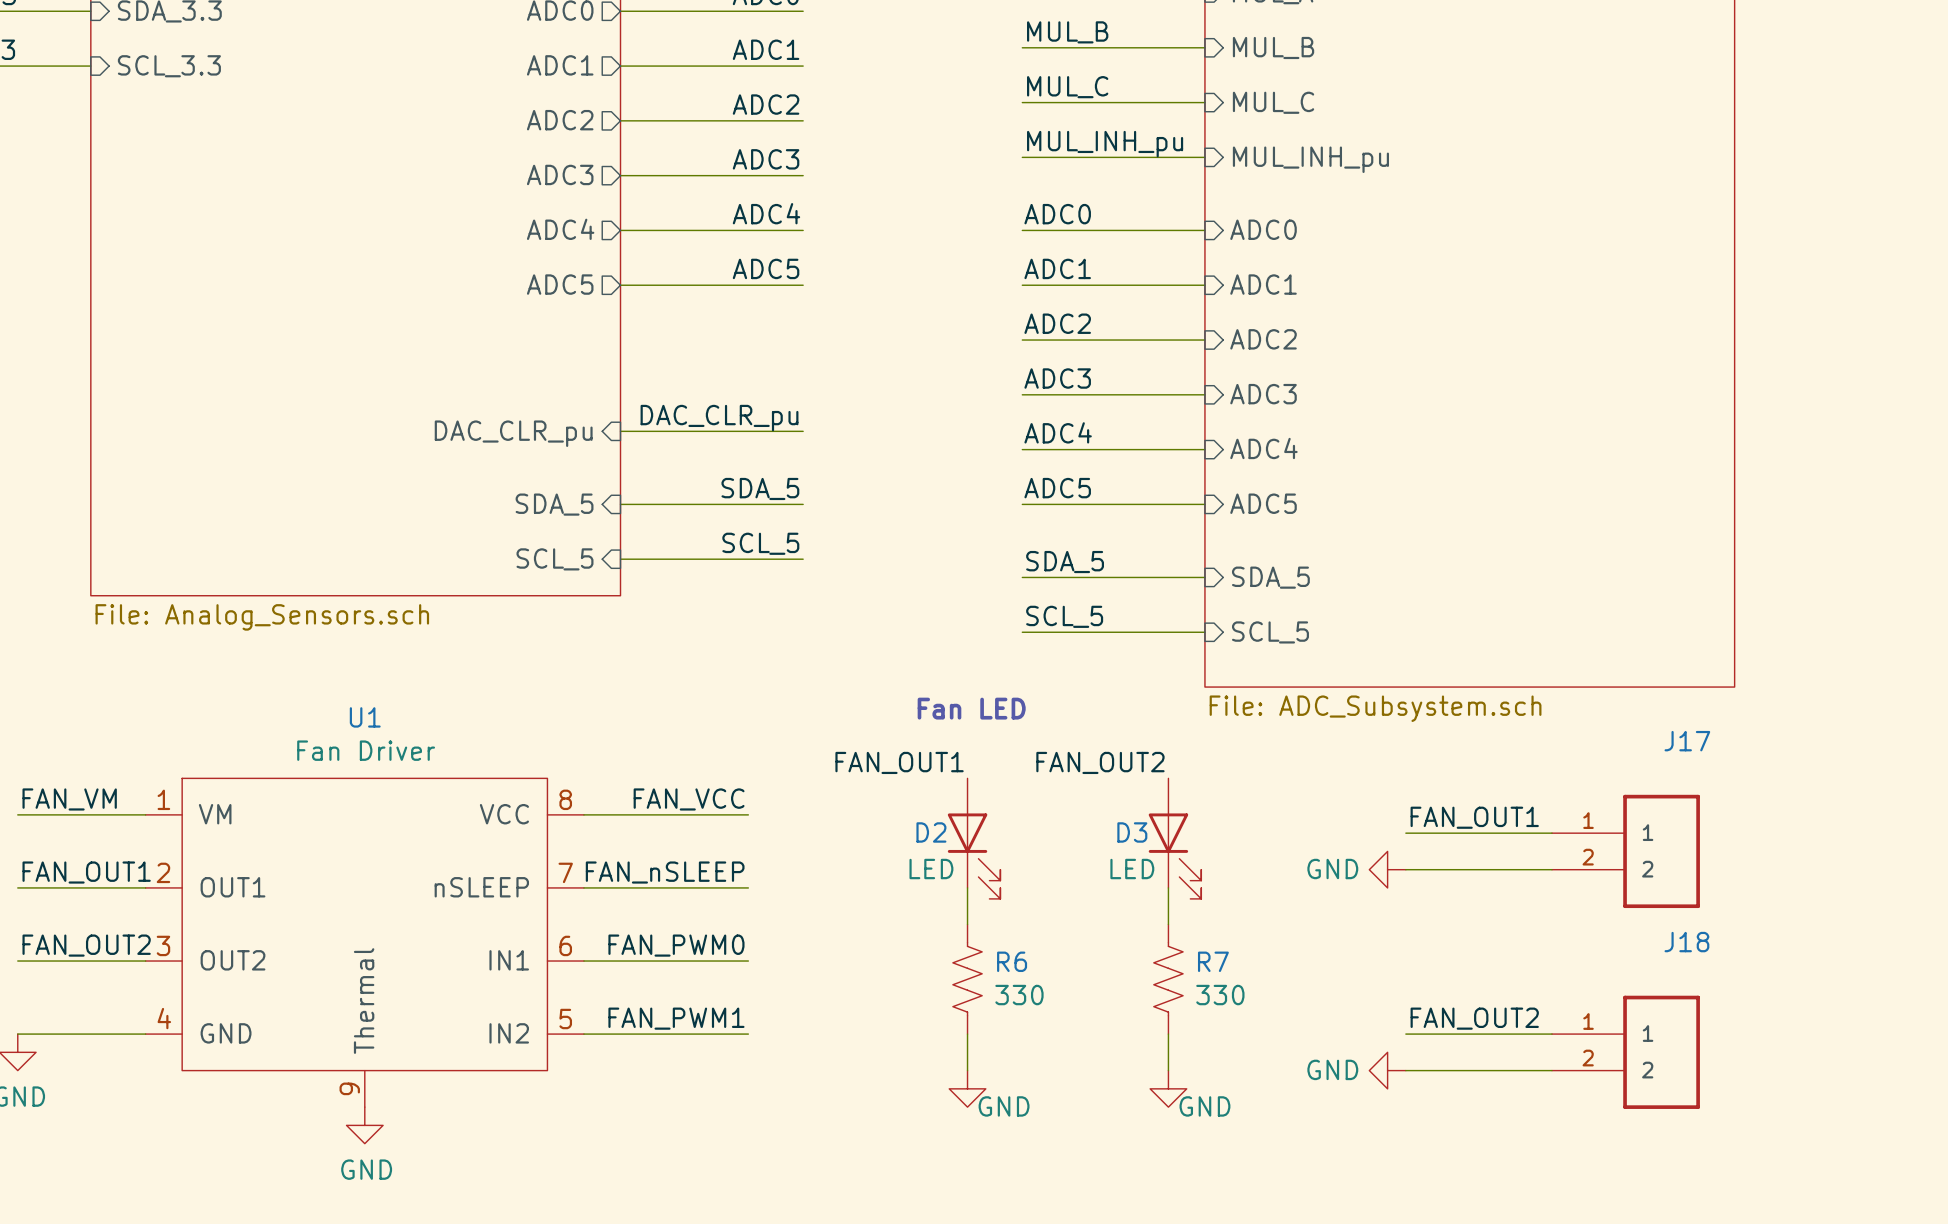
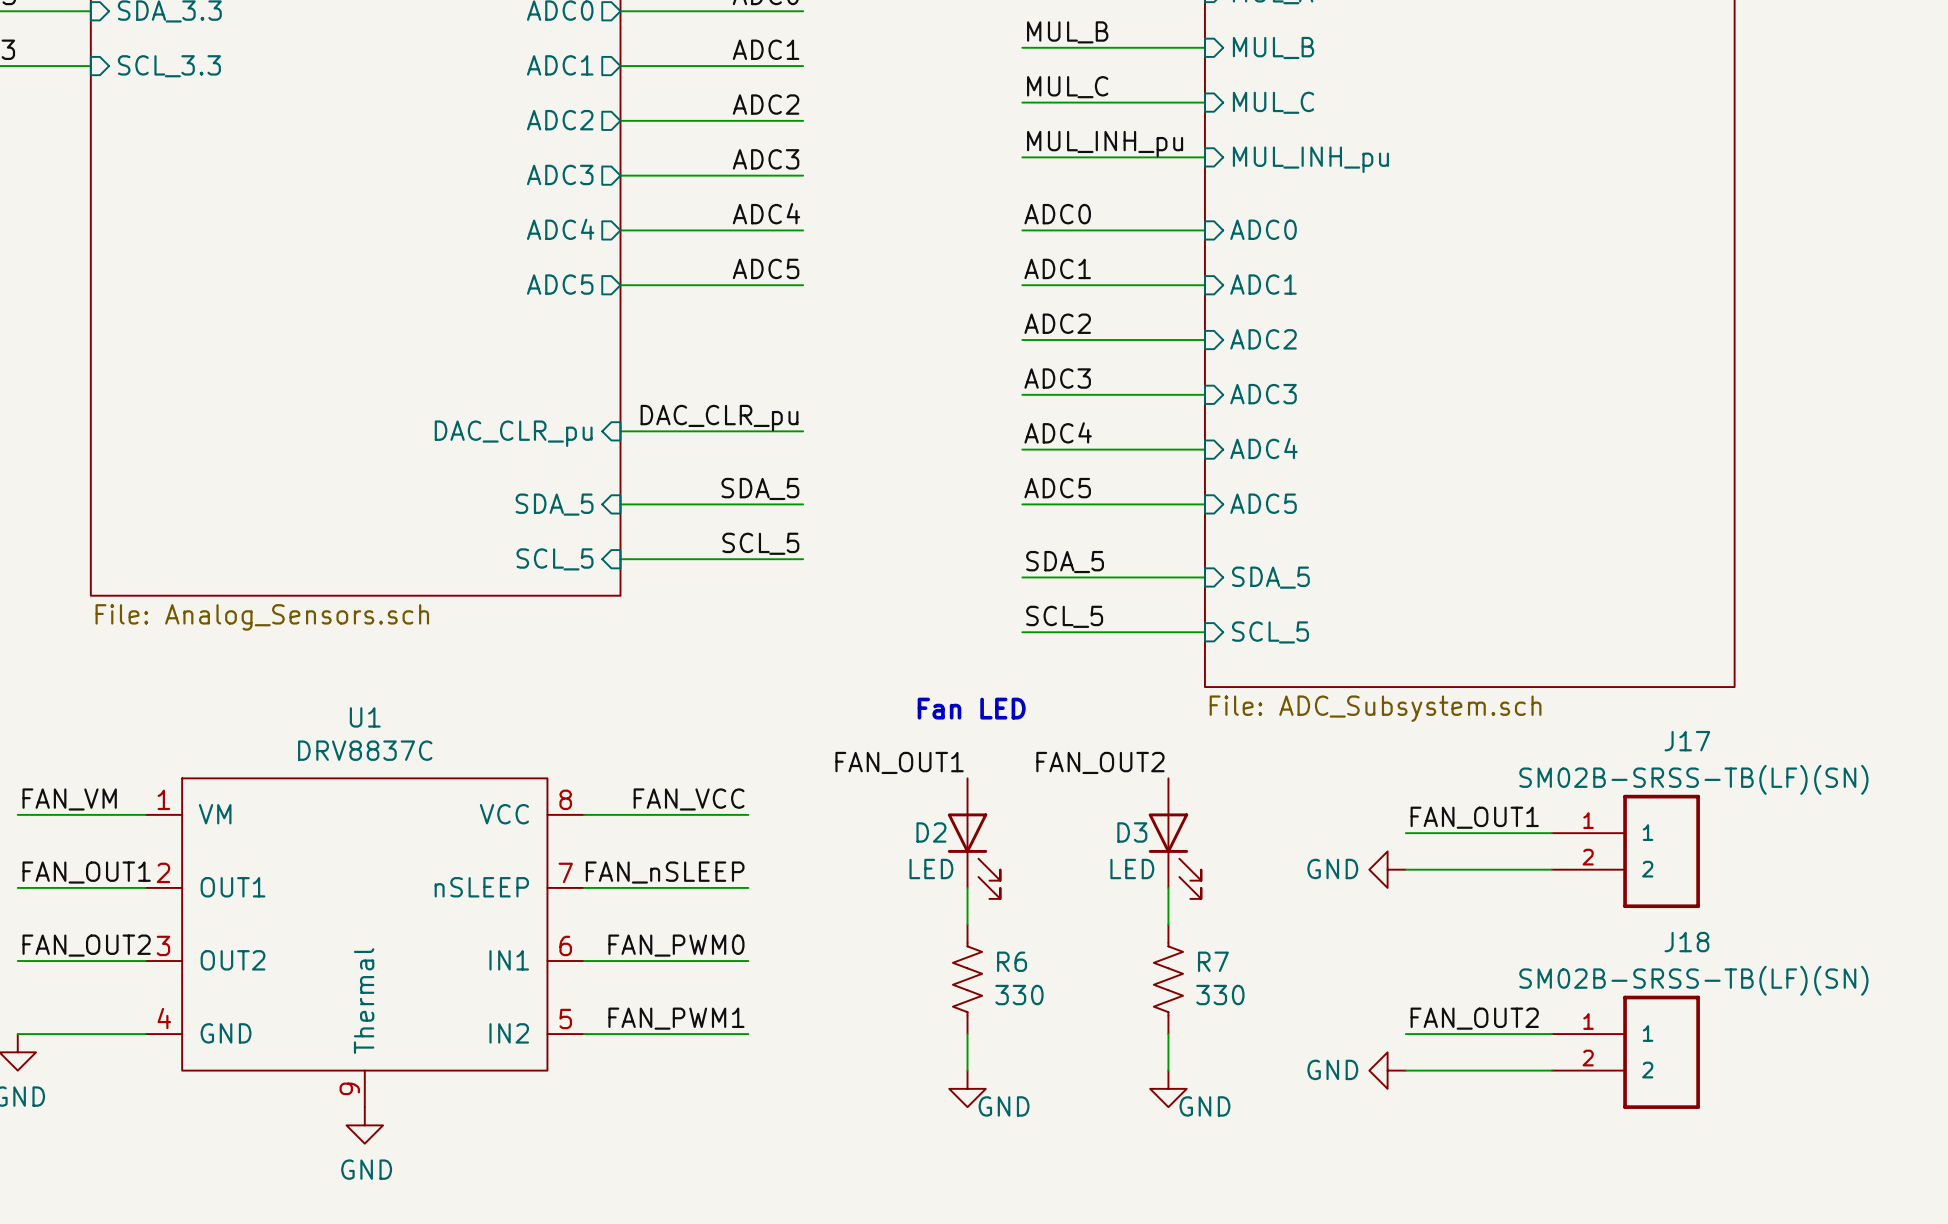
U1 value: Fan Driver (366, 750) -> DRV8837C (365, 750)
J17 value: none -> SM02B-SRSS-TB(LF)(SN) (1693, 779)
J18 value: none -> SM02B-SRSS-TB(LF)(SN) (1693, 980)

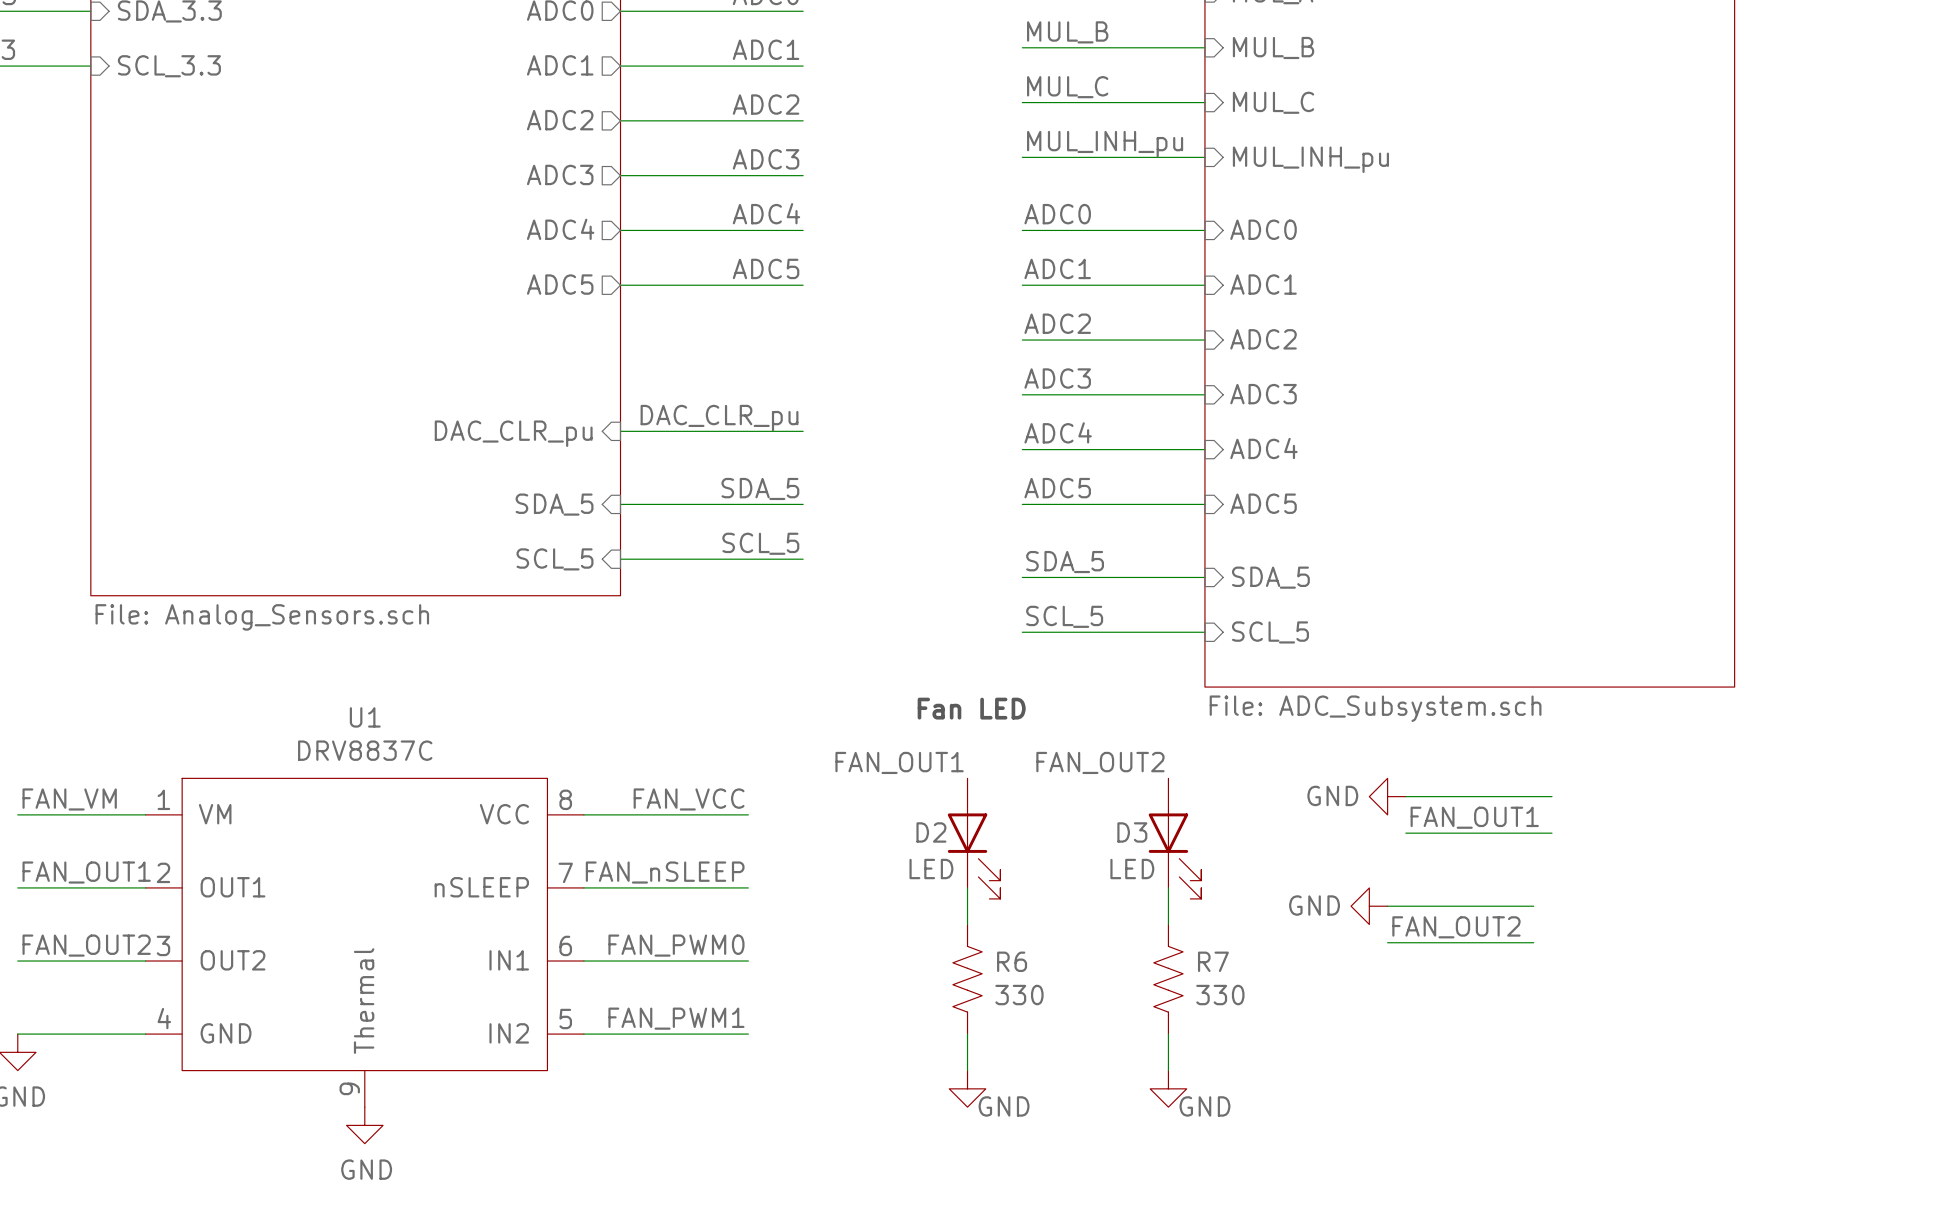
power symbol: none -> GND (1387, 796)
J17: SM02B-SRSS-TB(LF)(SN) (1625, 851) -> none
power symbol: GND (1387, 869) -> none
wire: (1405, 869) (1551, 869) -> (1405, 796) (1551, 796)
power symbol: none -> GND (1369, 906)
label position: FAN_OUT2 (1474, 1018) -> FAN_OUT2 (1456, 927)
wire: (1405, 1034) (1551, 1034) -> (1387, 906) (1533, 906)
J18: SM02B-SRSS-TB(LF)(SN) (1625, 1052) -> none
power symbol: GND (1387, 1070) -> none
wire: (1405, 1070) (1551, 1070) -> (1387, 942) (1533, 942)

